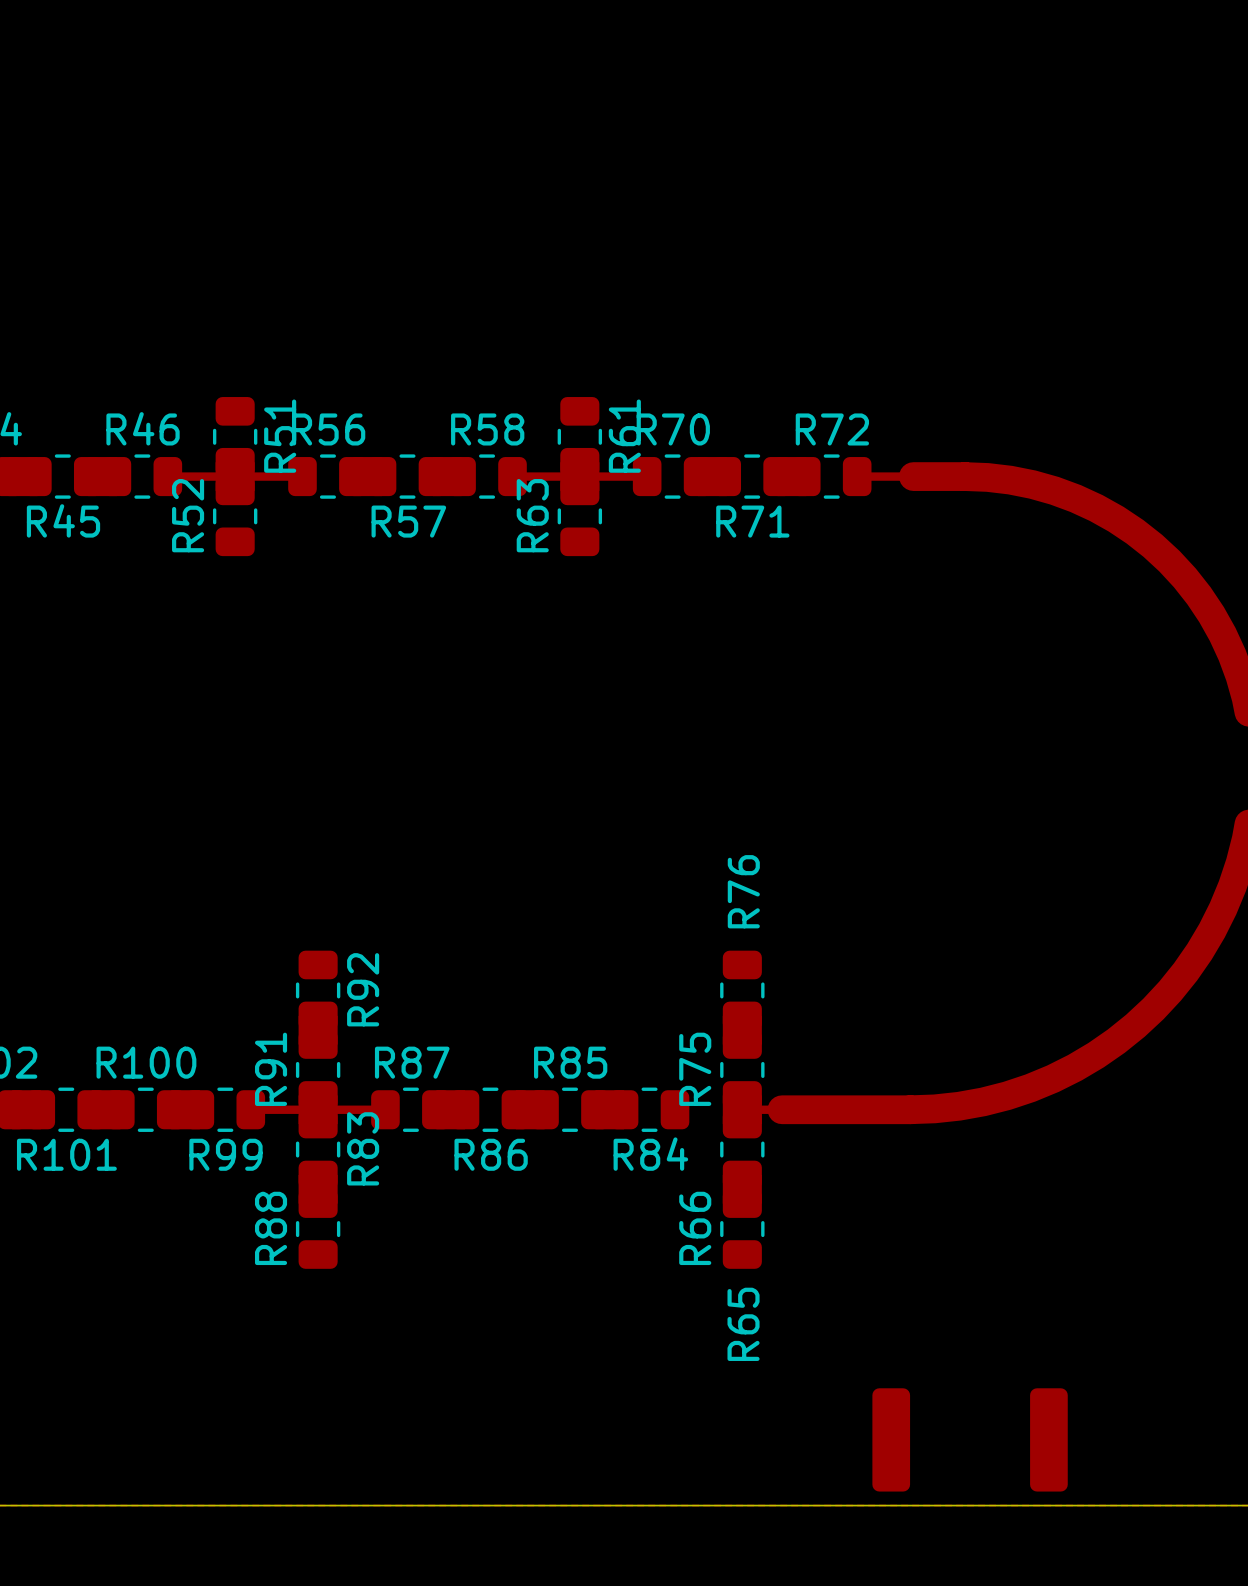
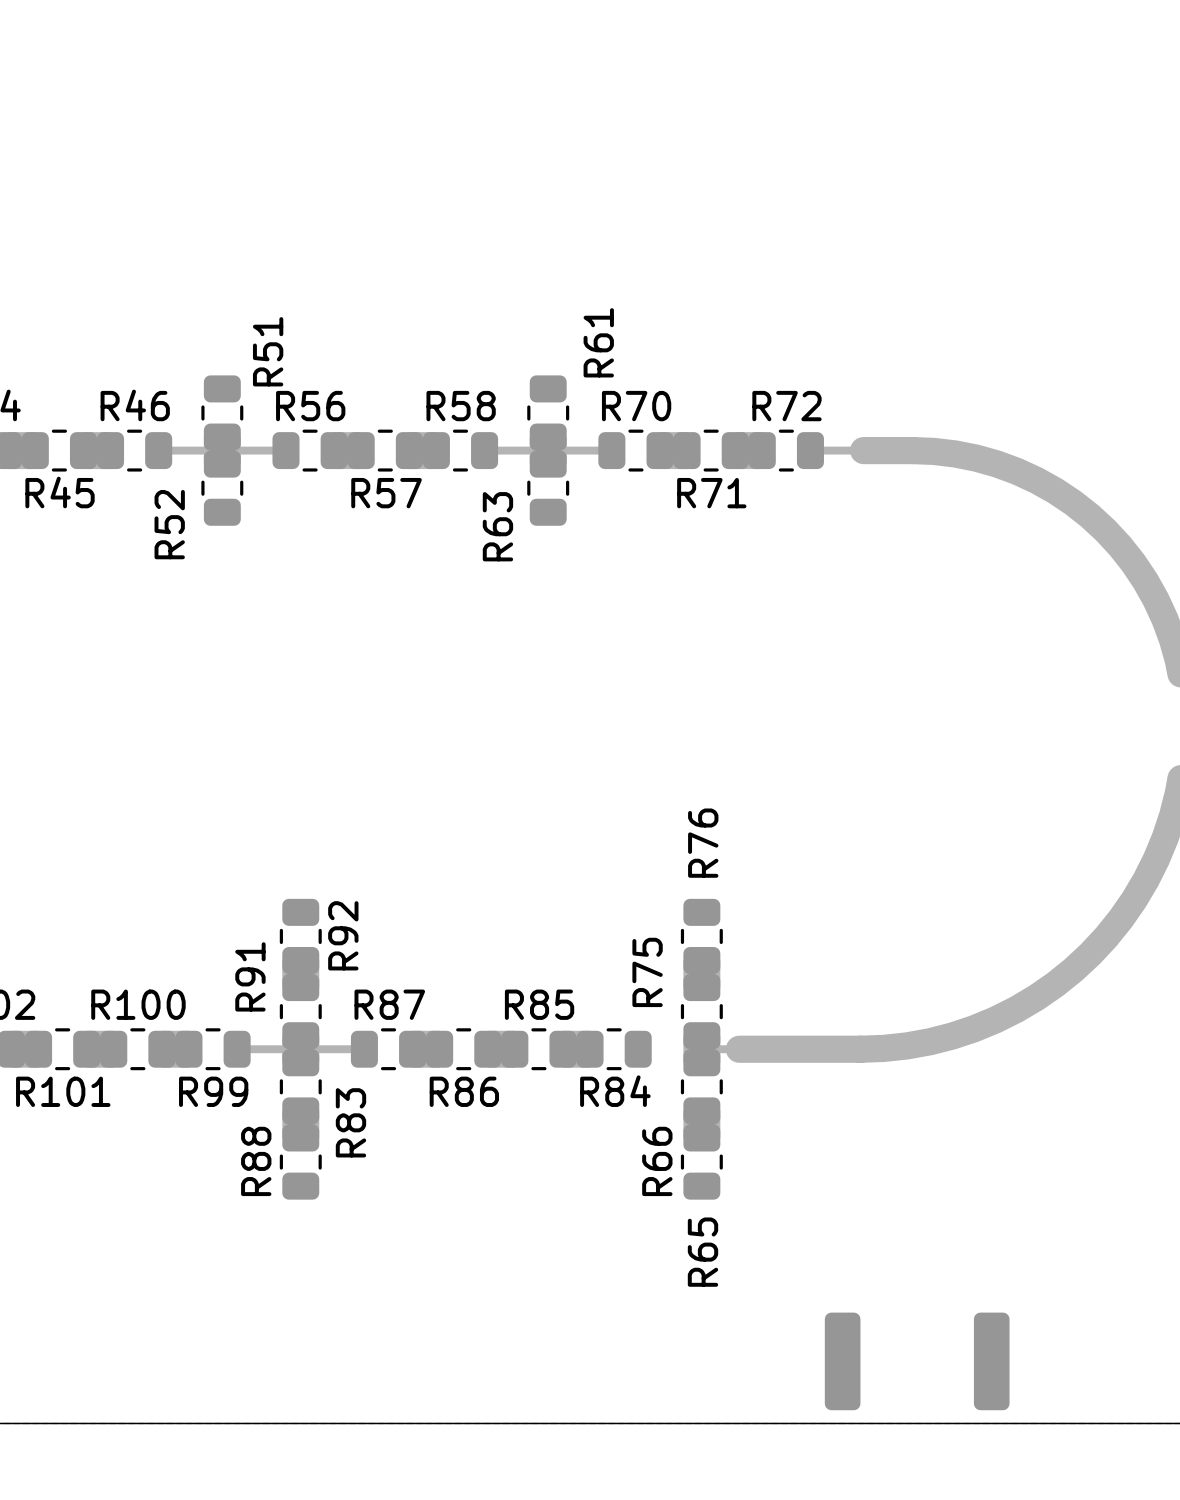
R51 name position: R51 (280, 436) -> R51 (268, 351)
R61 name position: R61 (624, 436) -> R61 (598, 342)
R52 name position: R52 (188, 515) -> R52 (169, 524)
R63 name position: R63 (532, 515) -> R63 (497, 526)
R91 name position: R91 (271, 1069) -> R91 (250, 976)
R75 name position: R75 (695, 1069) -> R75 (647, 972)
R83 name position: R83 (363, 1148) -> R83 (350, 1122)

